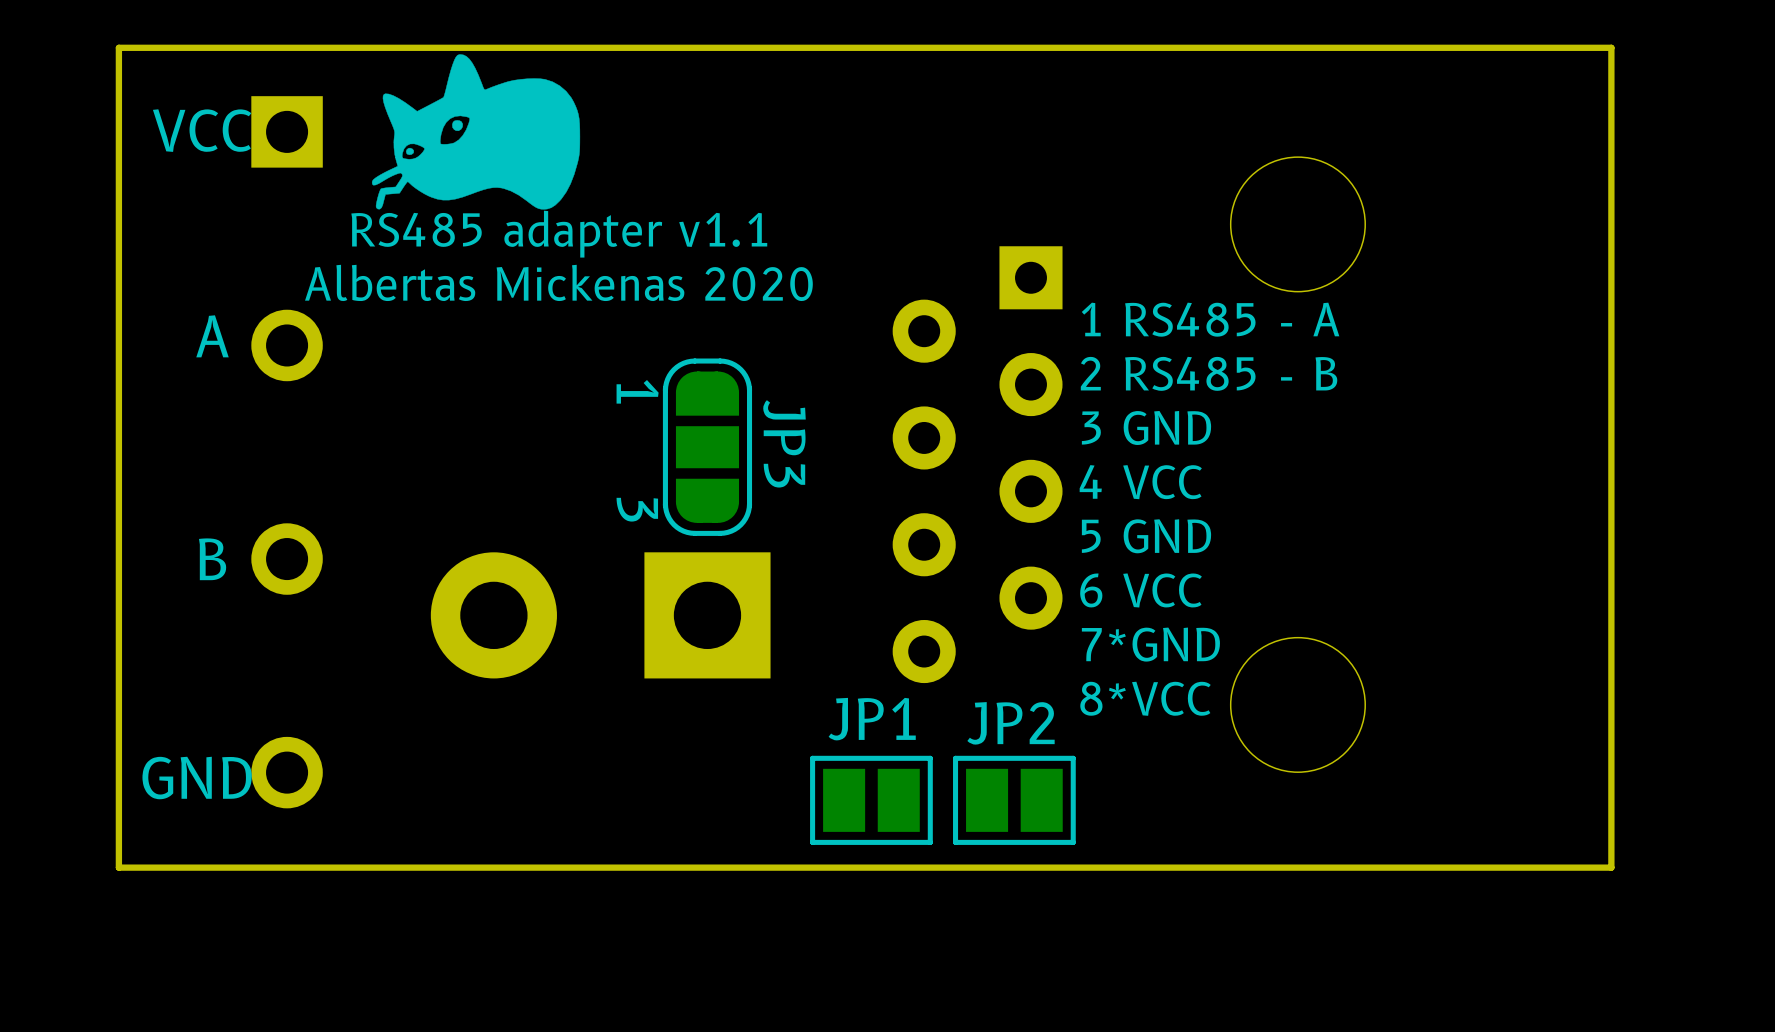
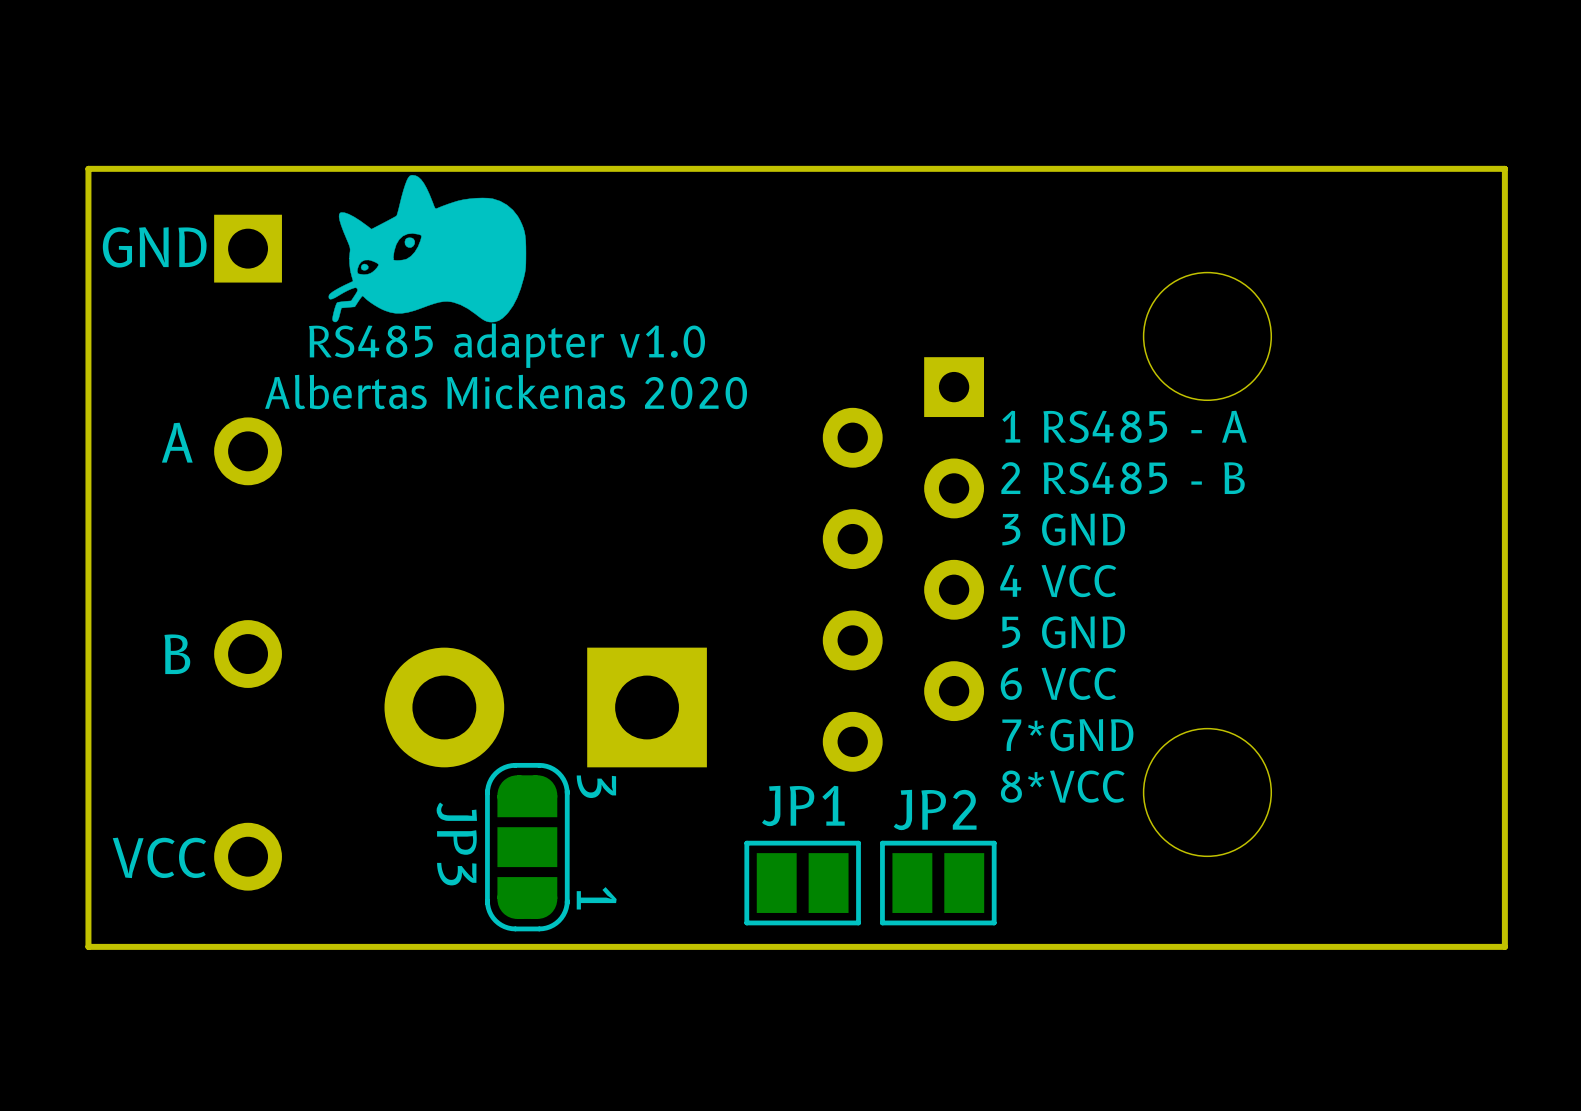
text position: VCC (202, 130) -> VCC (159, 857)
text: RS485 adapter v1.1 (559, 234) -> RS485 adapter v1.0 (507, 345)
JP3 rotation: 0° (707, 447) -> 180° (527, 847)
JP3 position: (707, 447) -> (527, 847)
text position: GND (197, 778) -> GND (154, 247)

